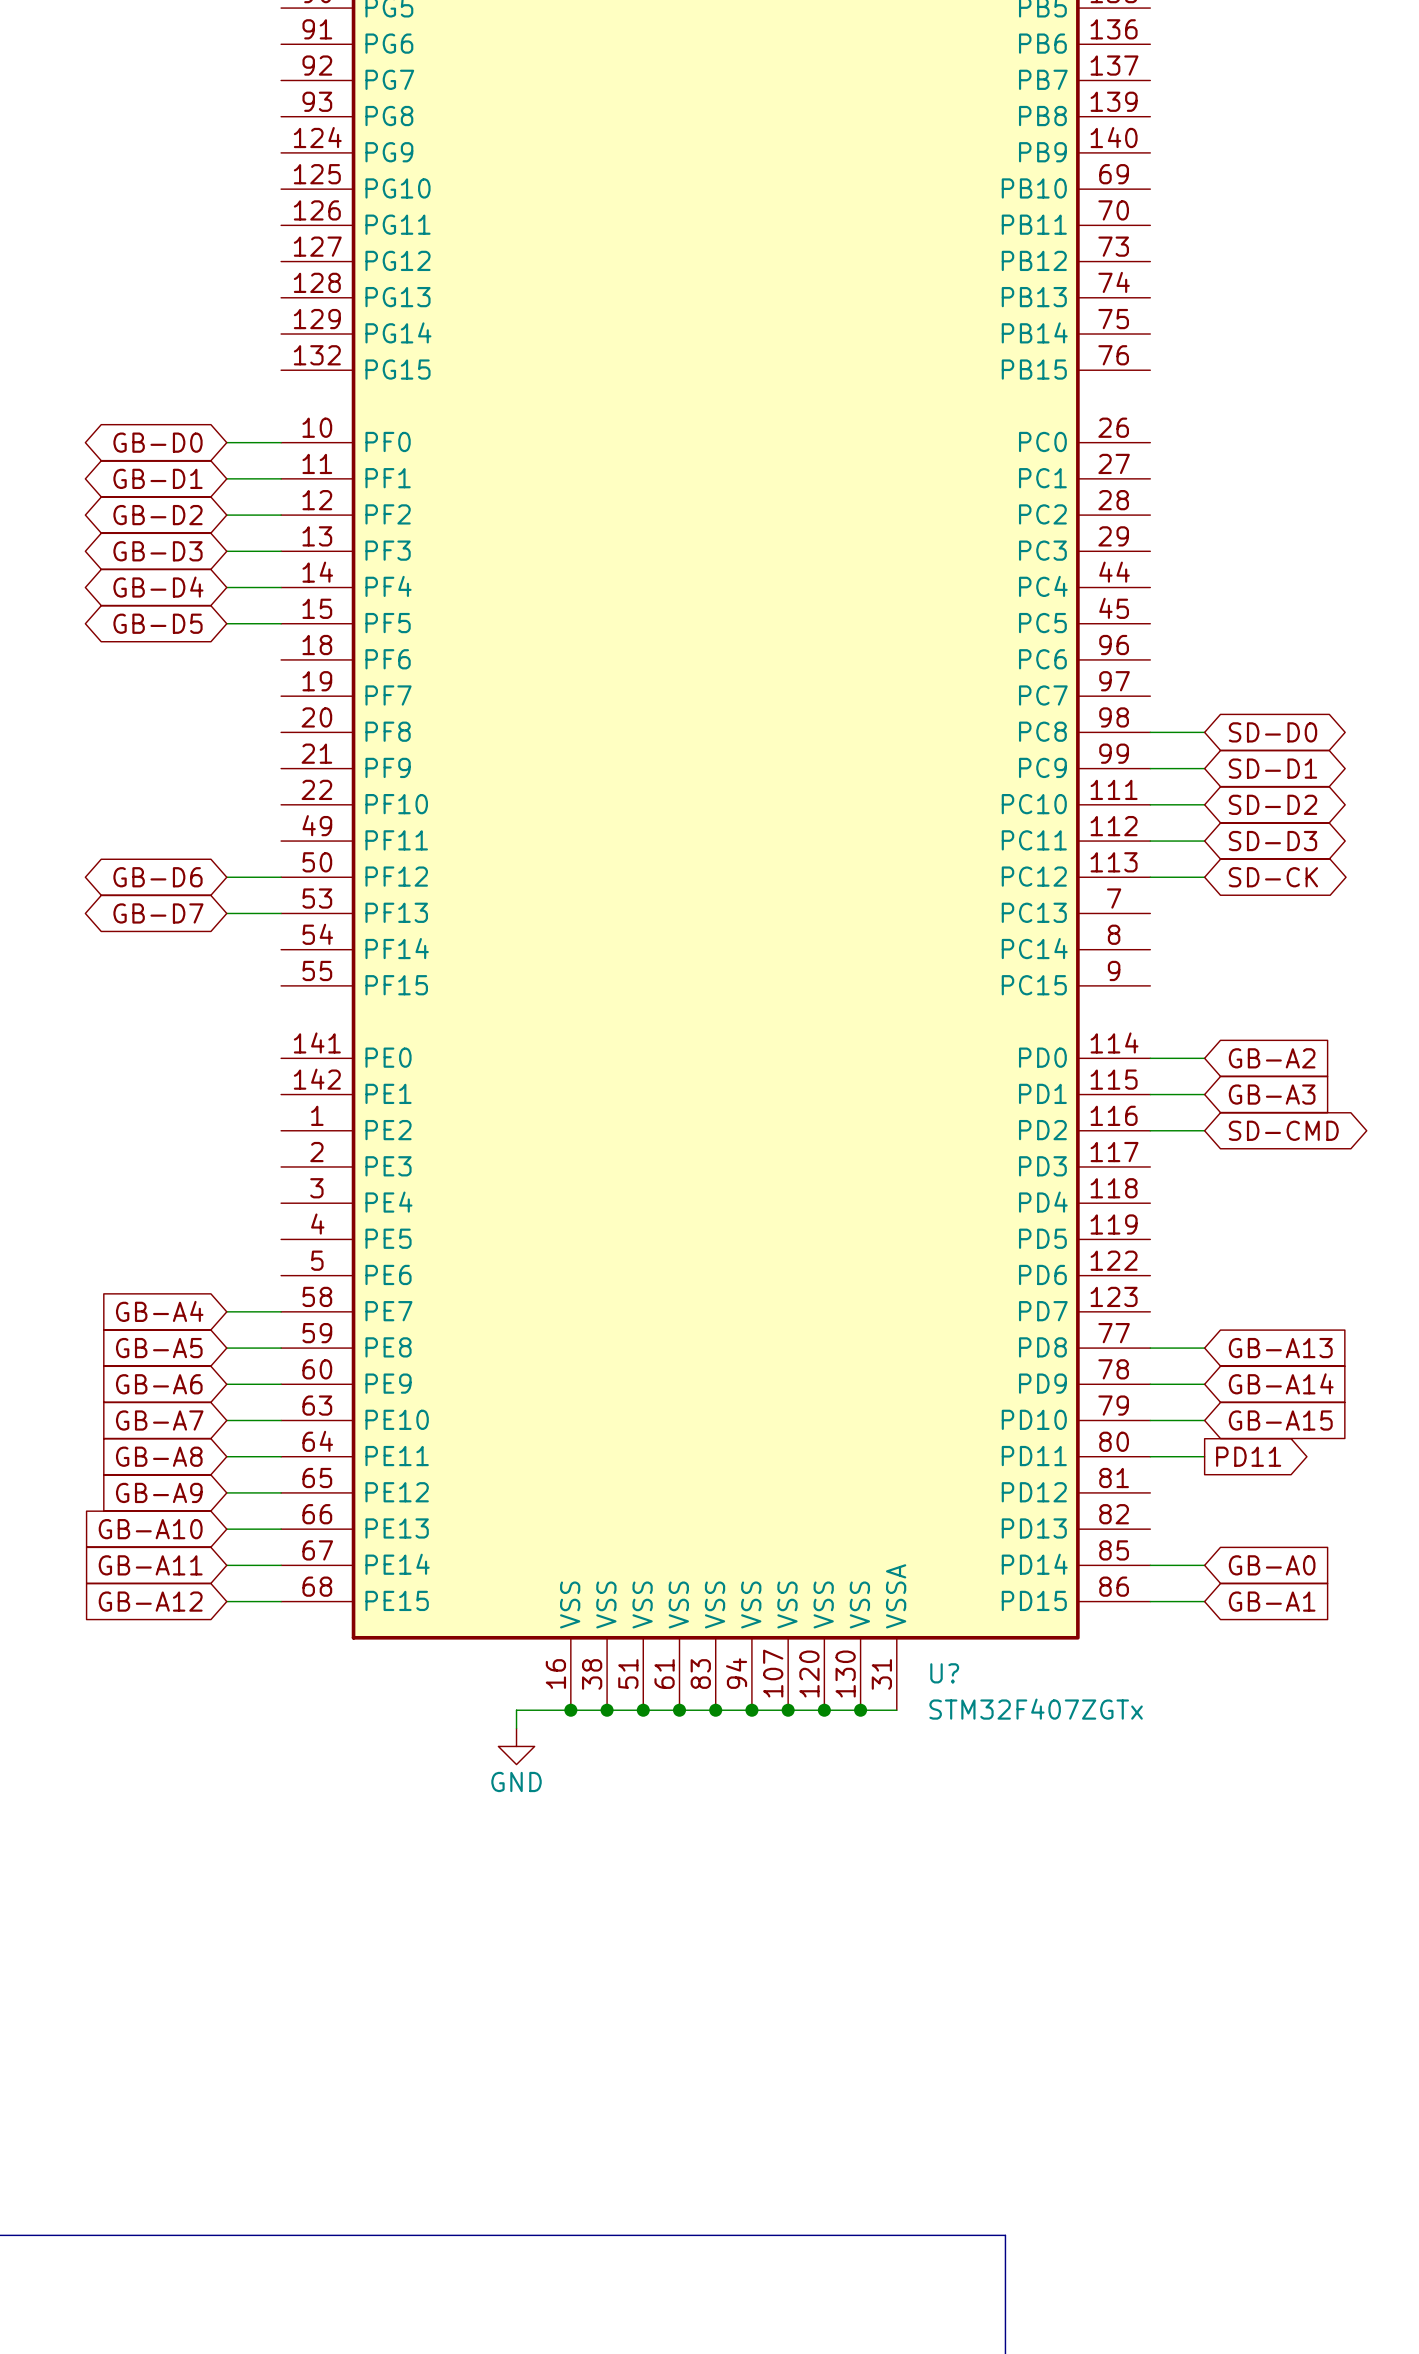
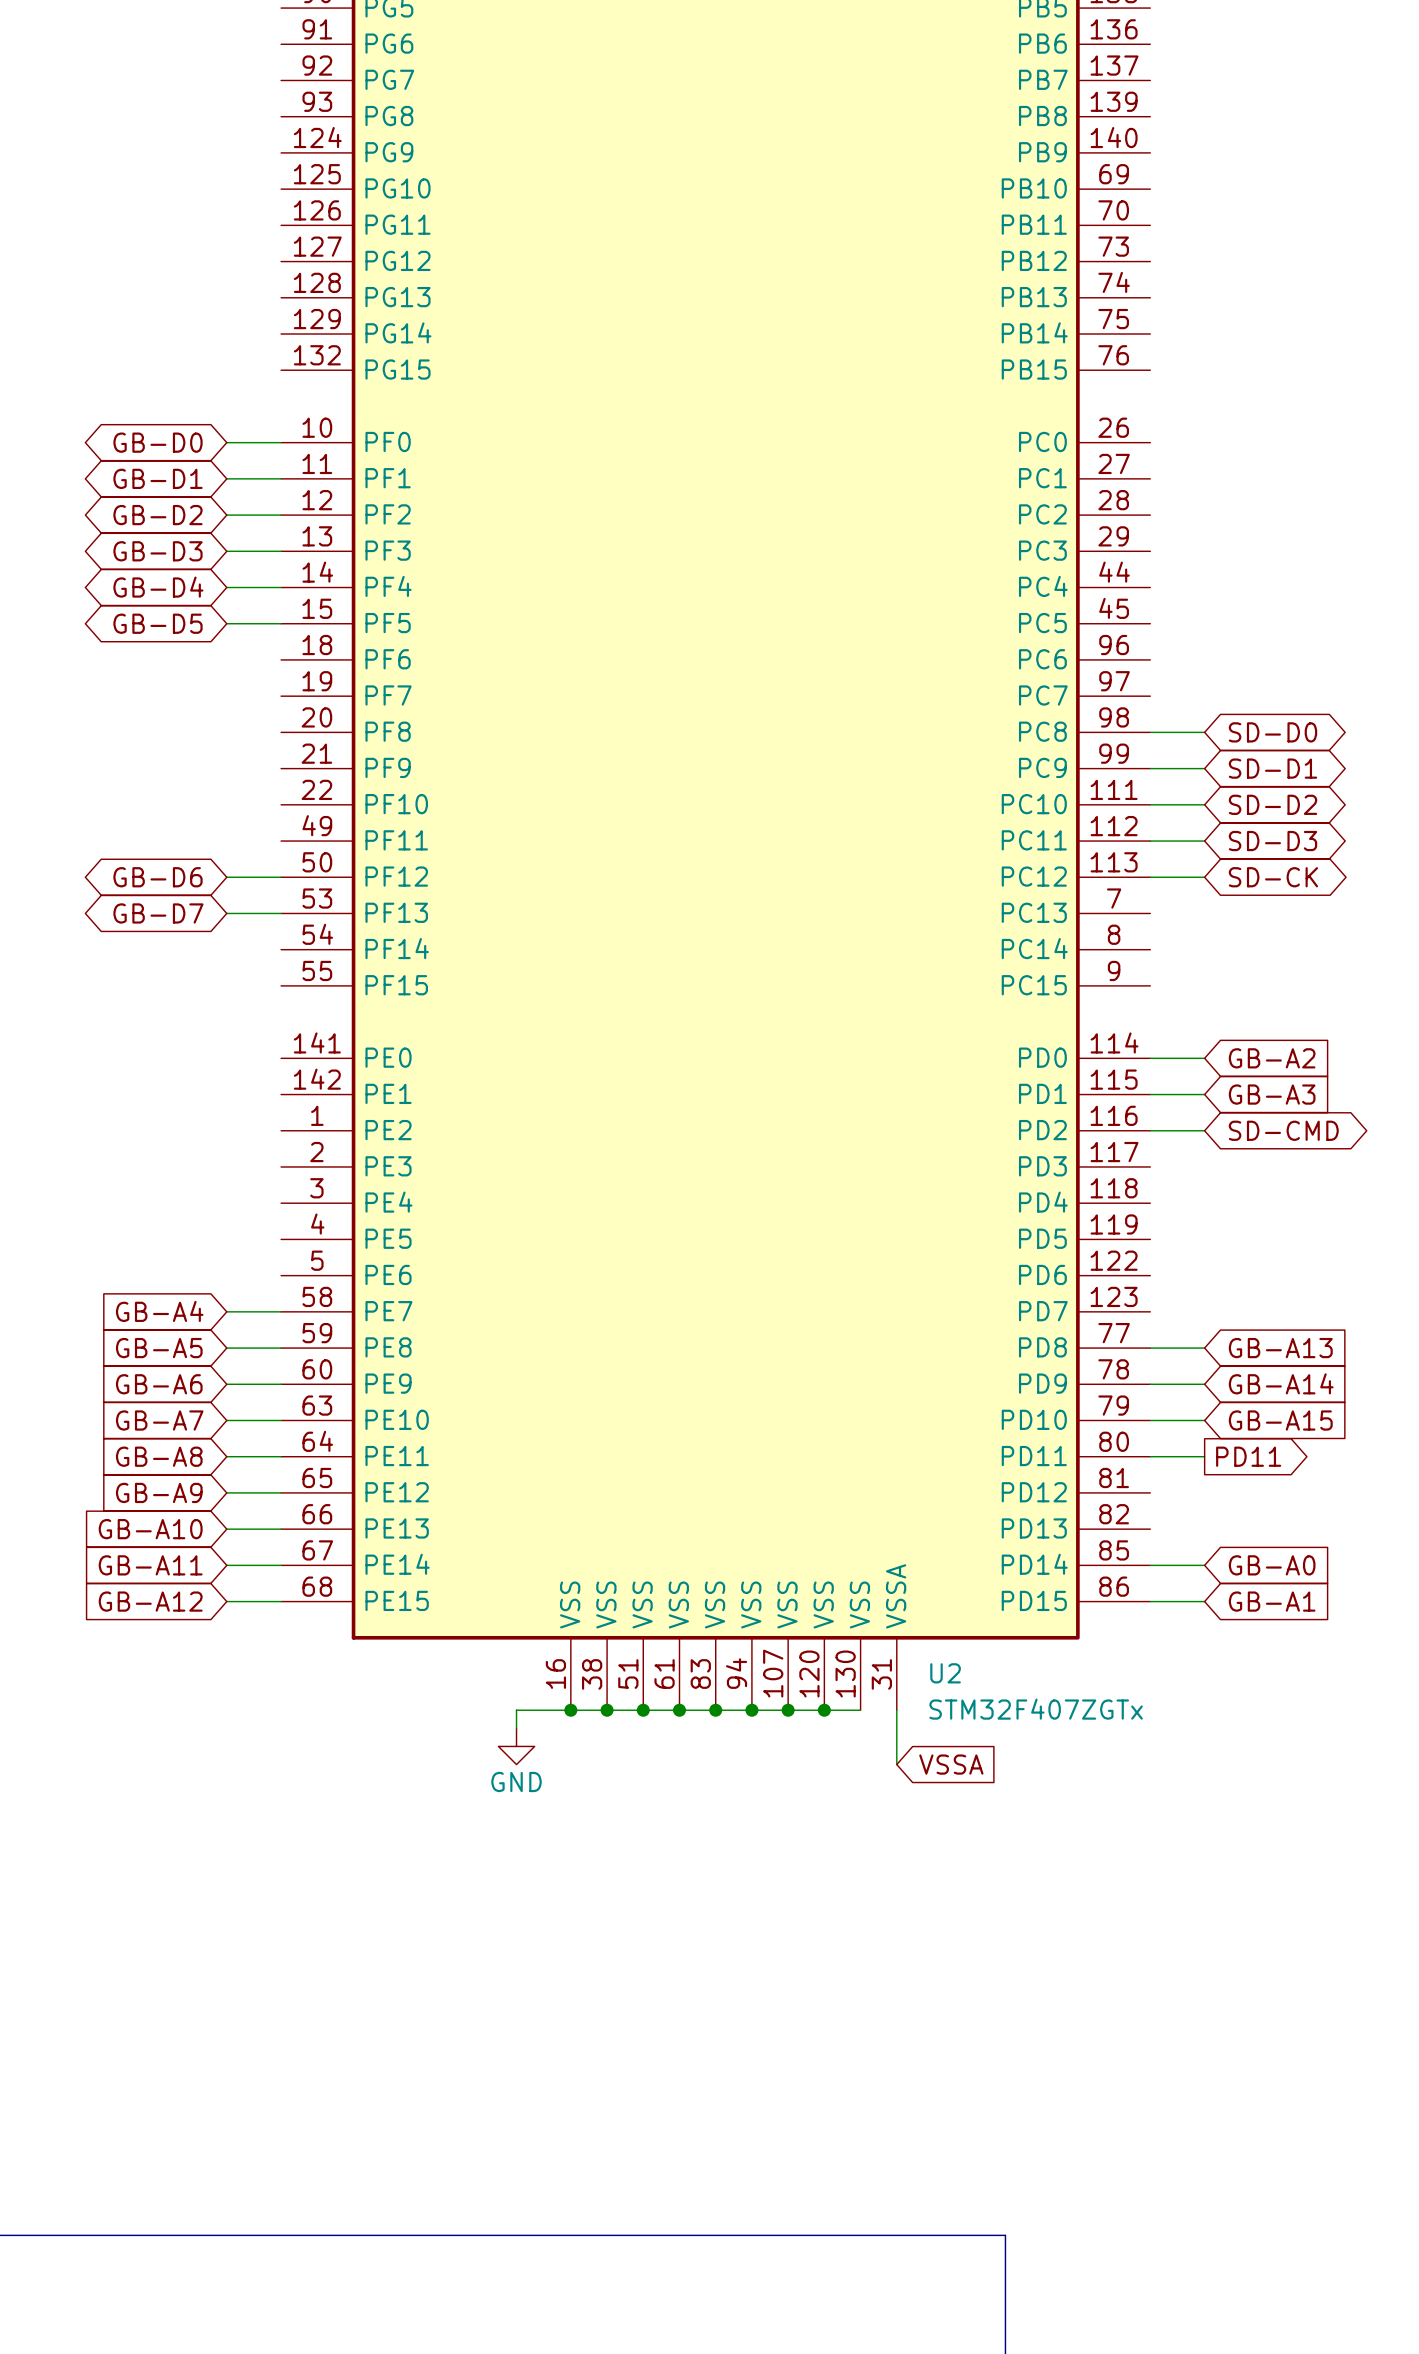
U? name: U? (944, 1673) -> U2 (945, 1673)
wire: (860, 1710) (896, 1710) -> (896, 1764) (896, 1710)
junction: (860, 1710) -> none
global label: none -> VSSA (951, 1764)

